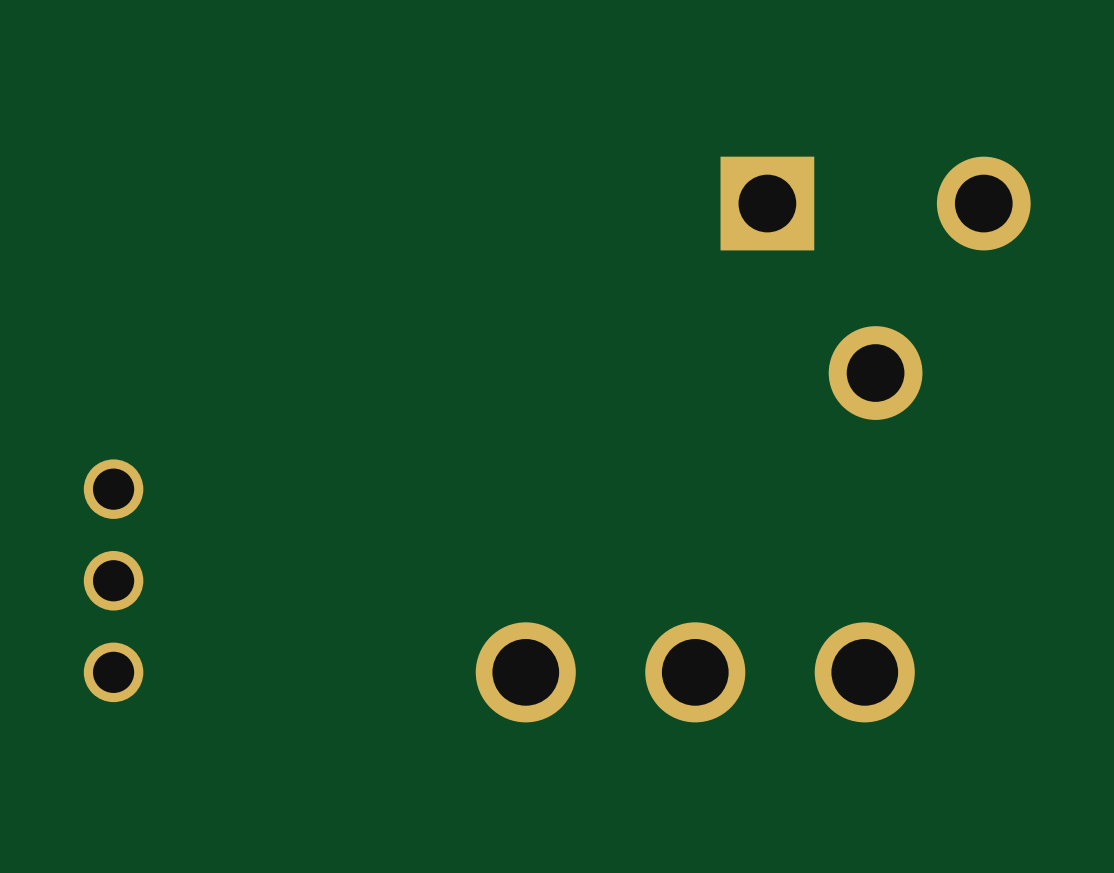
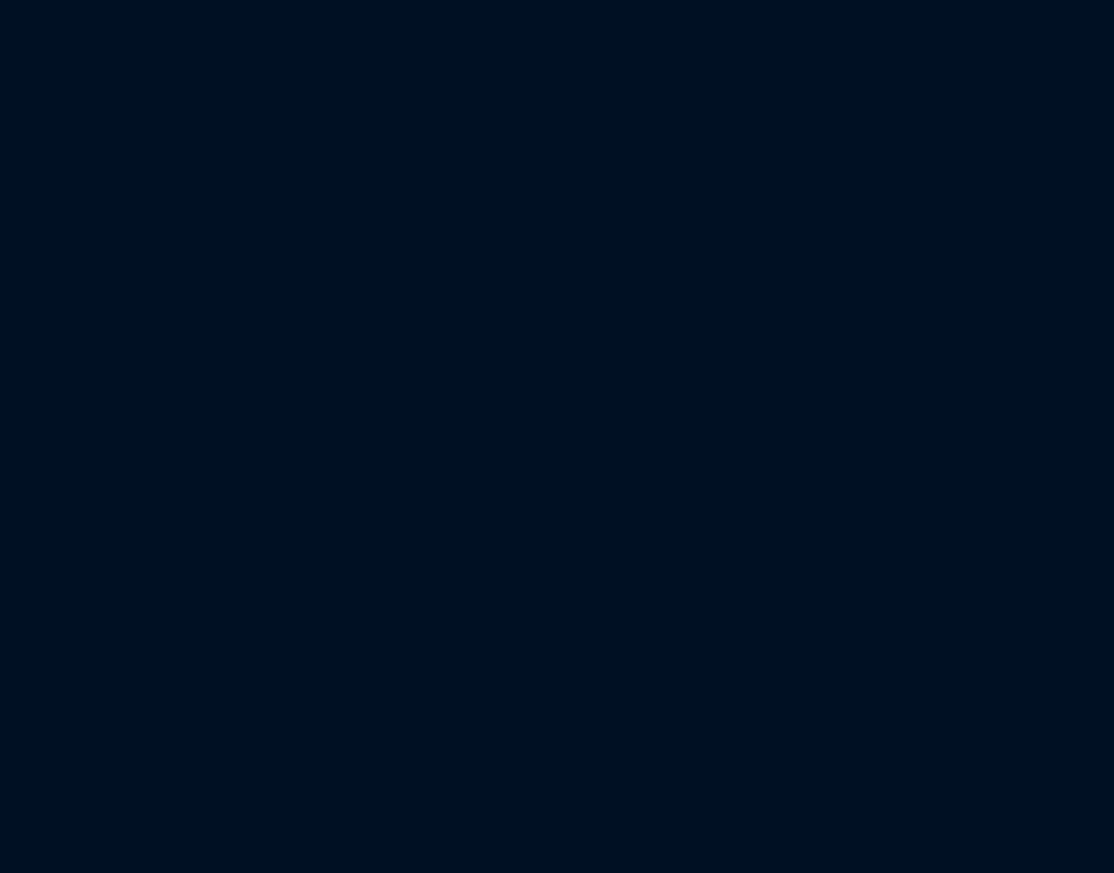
part: (875, 288) -> none
part: (113, 580) -> none
part: (695, 672) -> none

